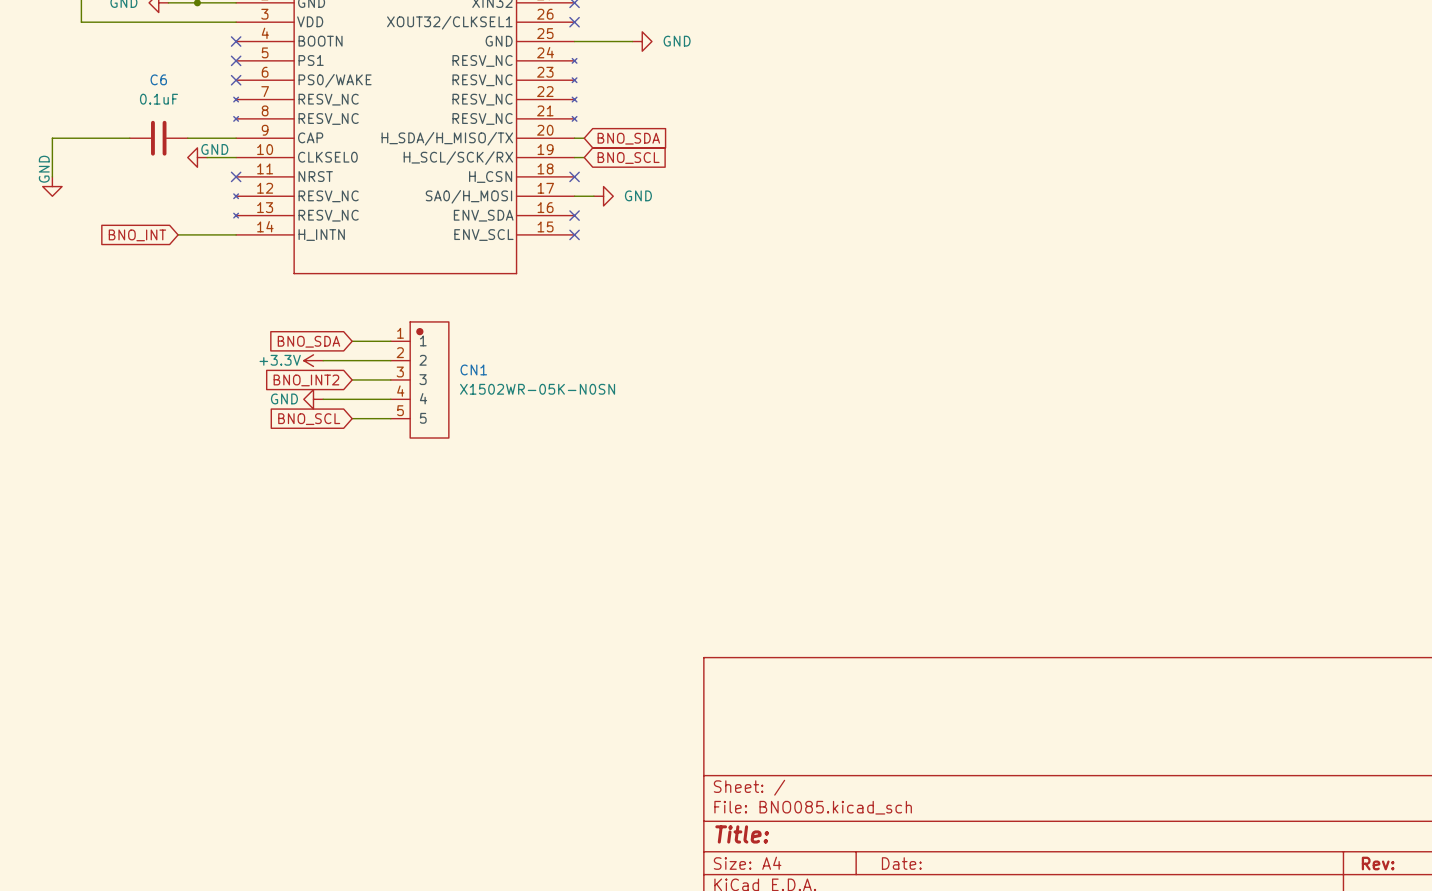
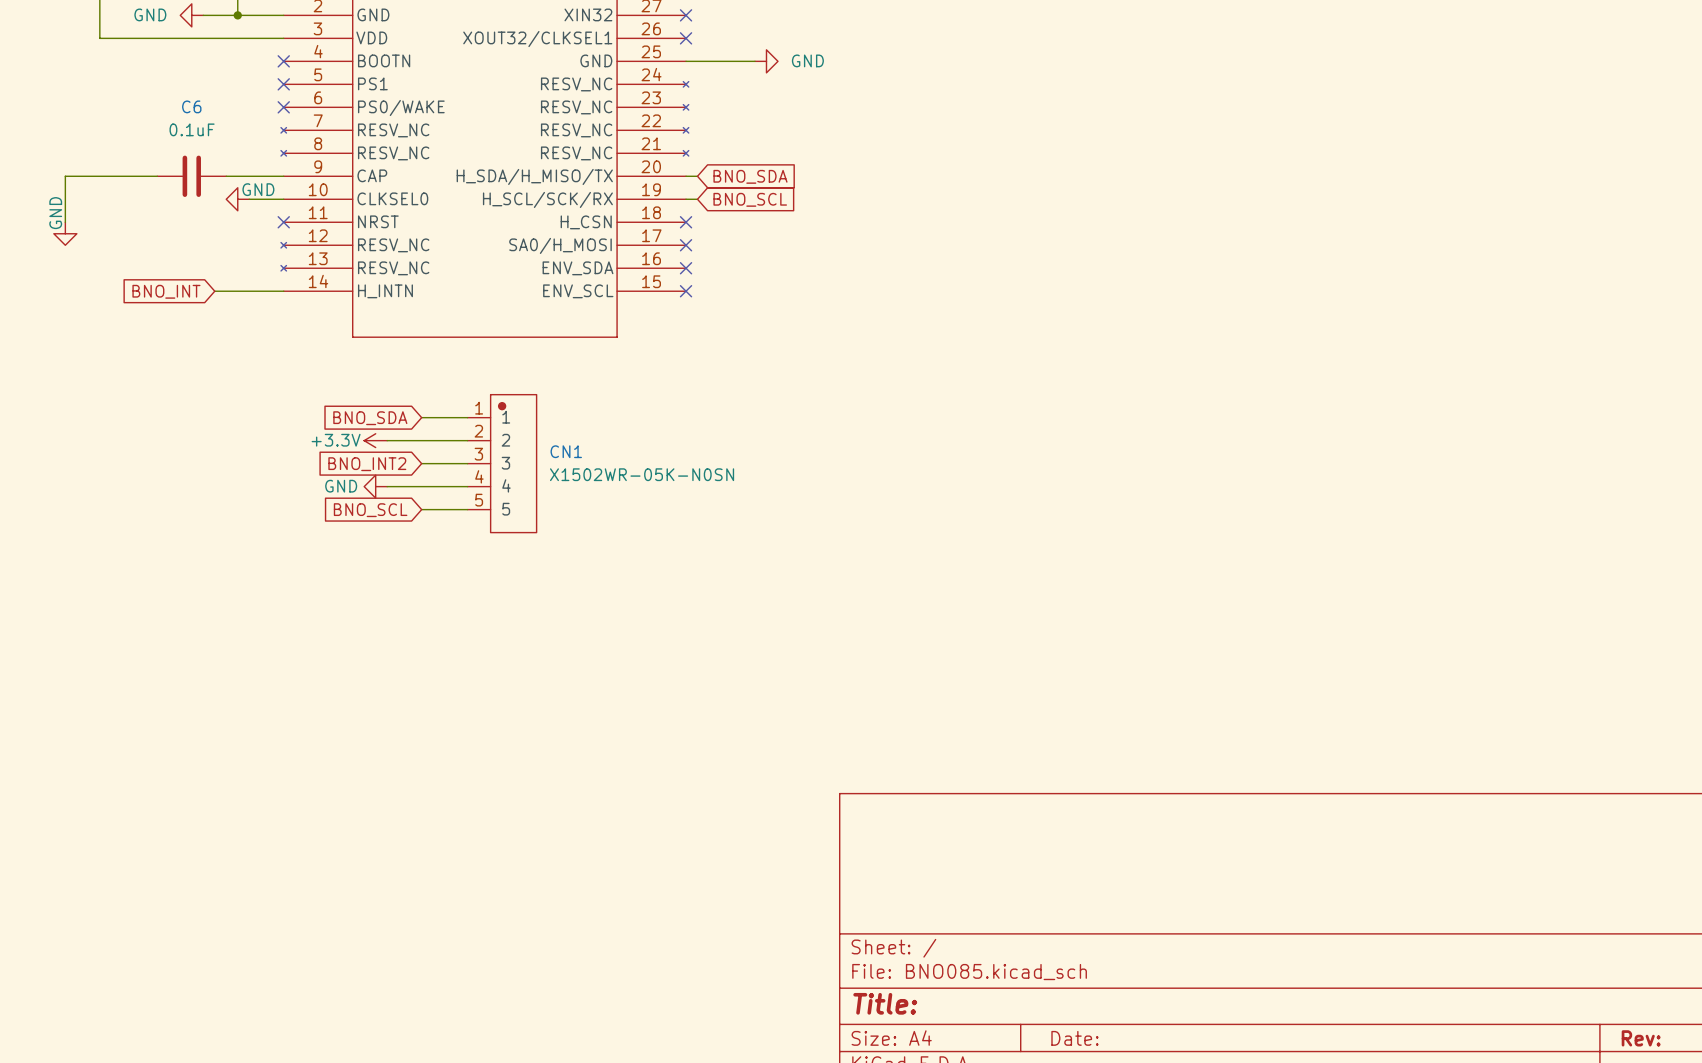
wire: (574, 196) (593, 196) -> none
no-connect mark: none -> (686, 245)
power symbol: GND (603, 196) -> none

